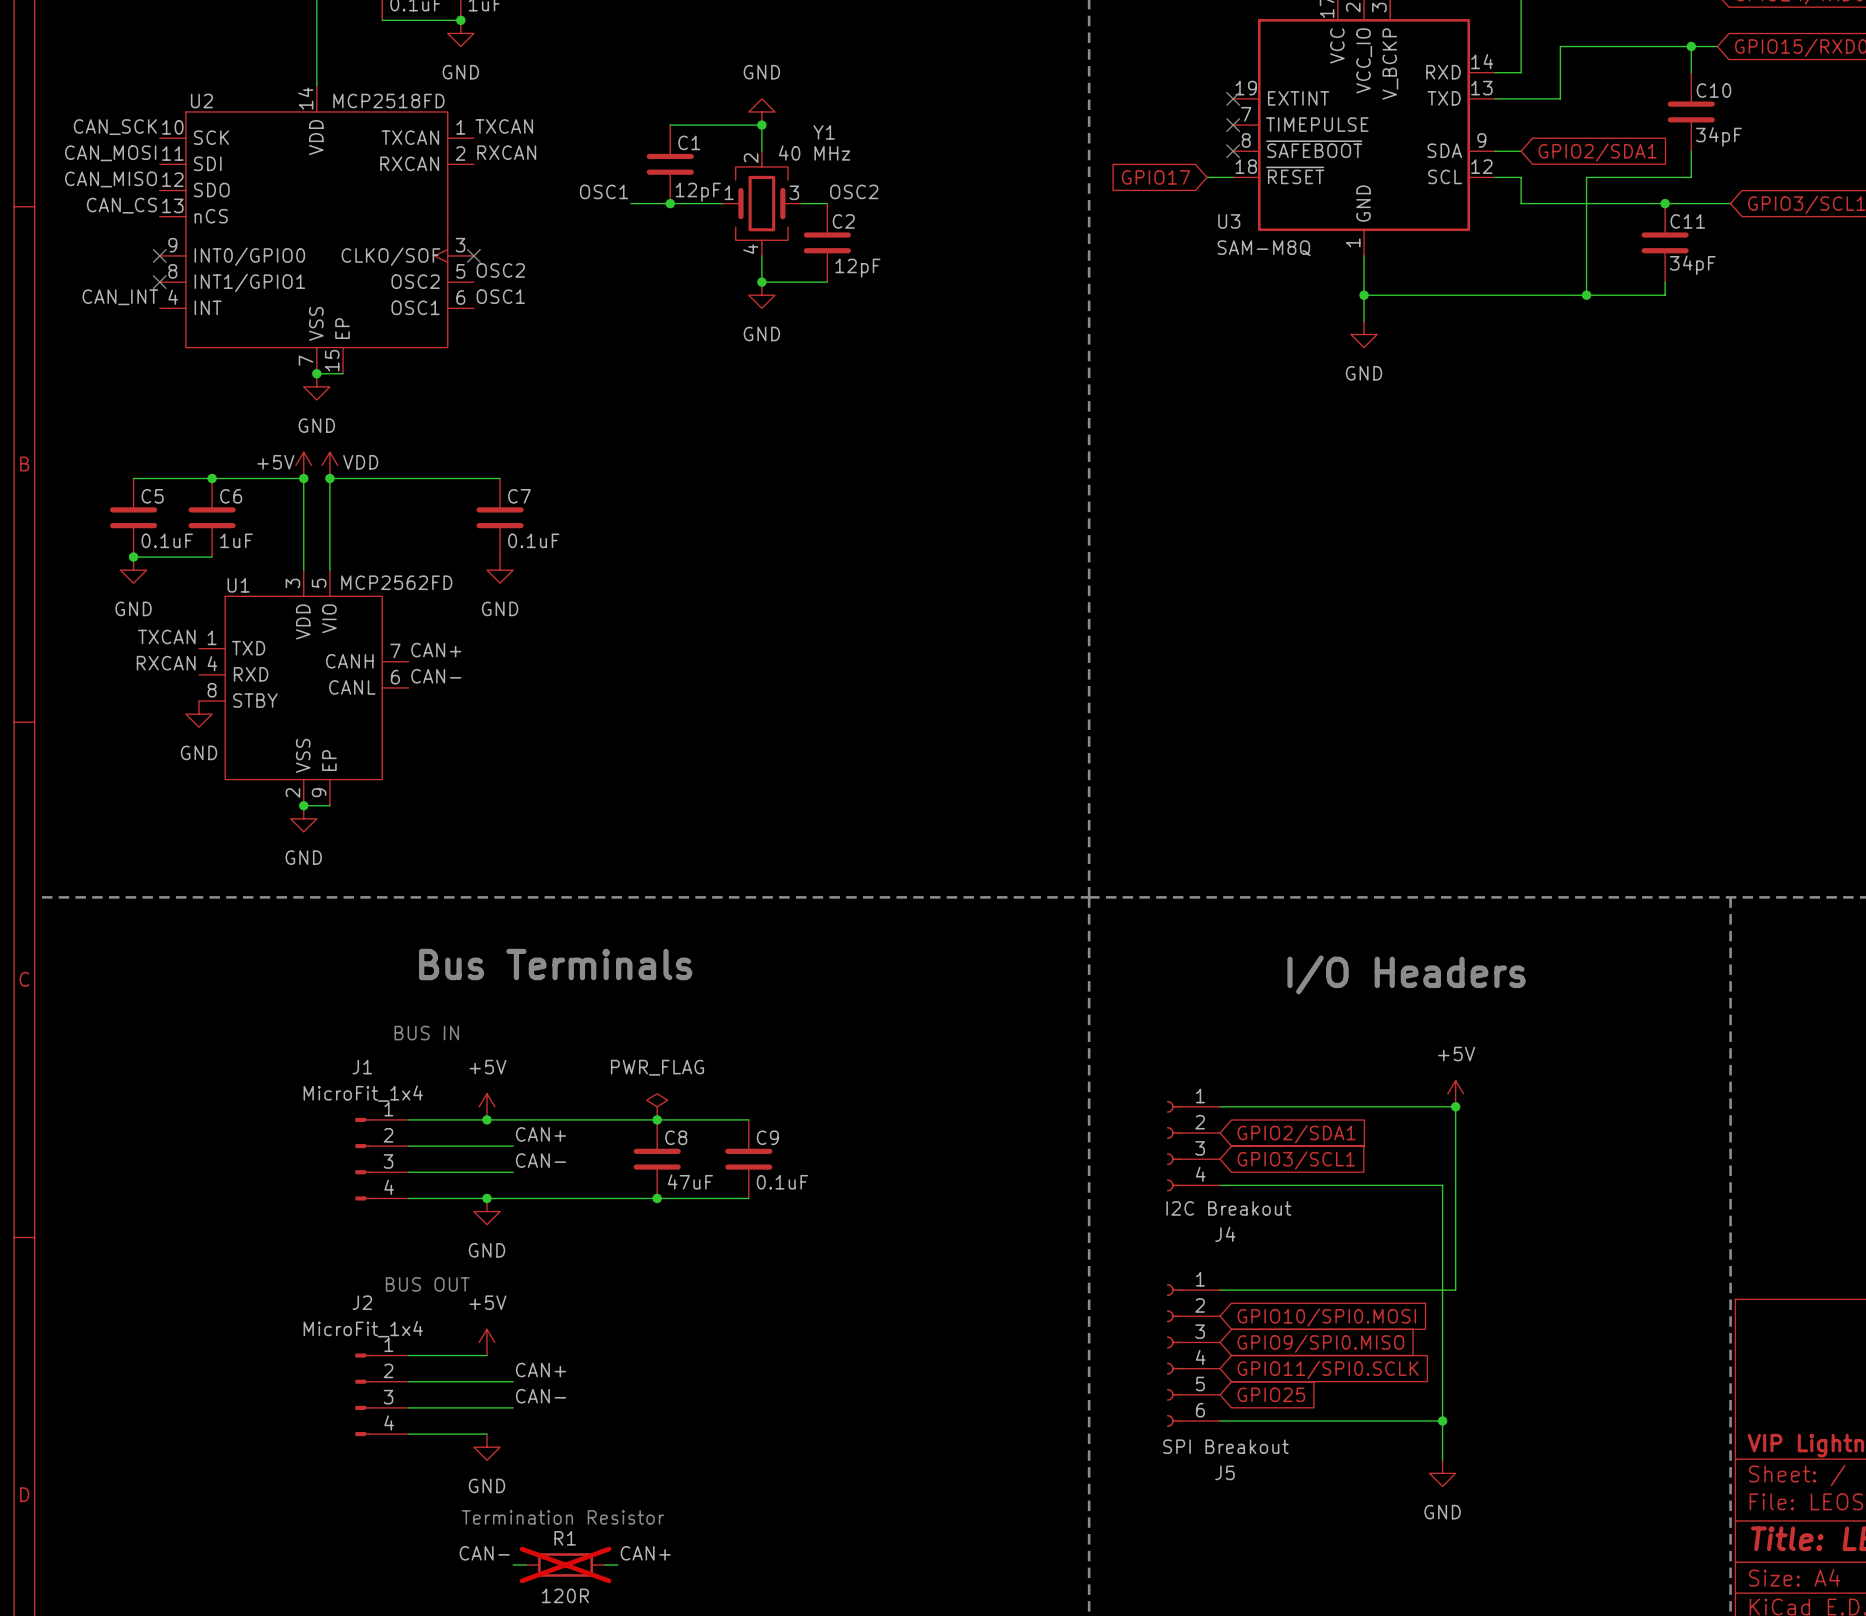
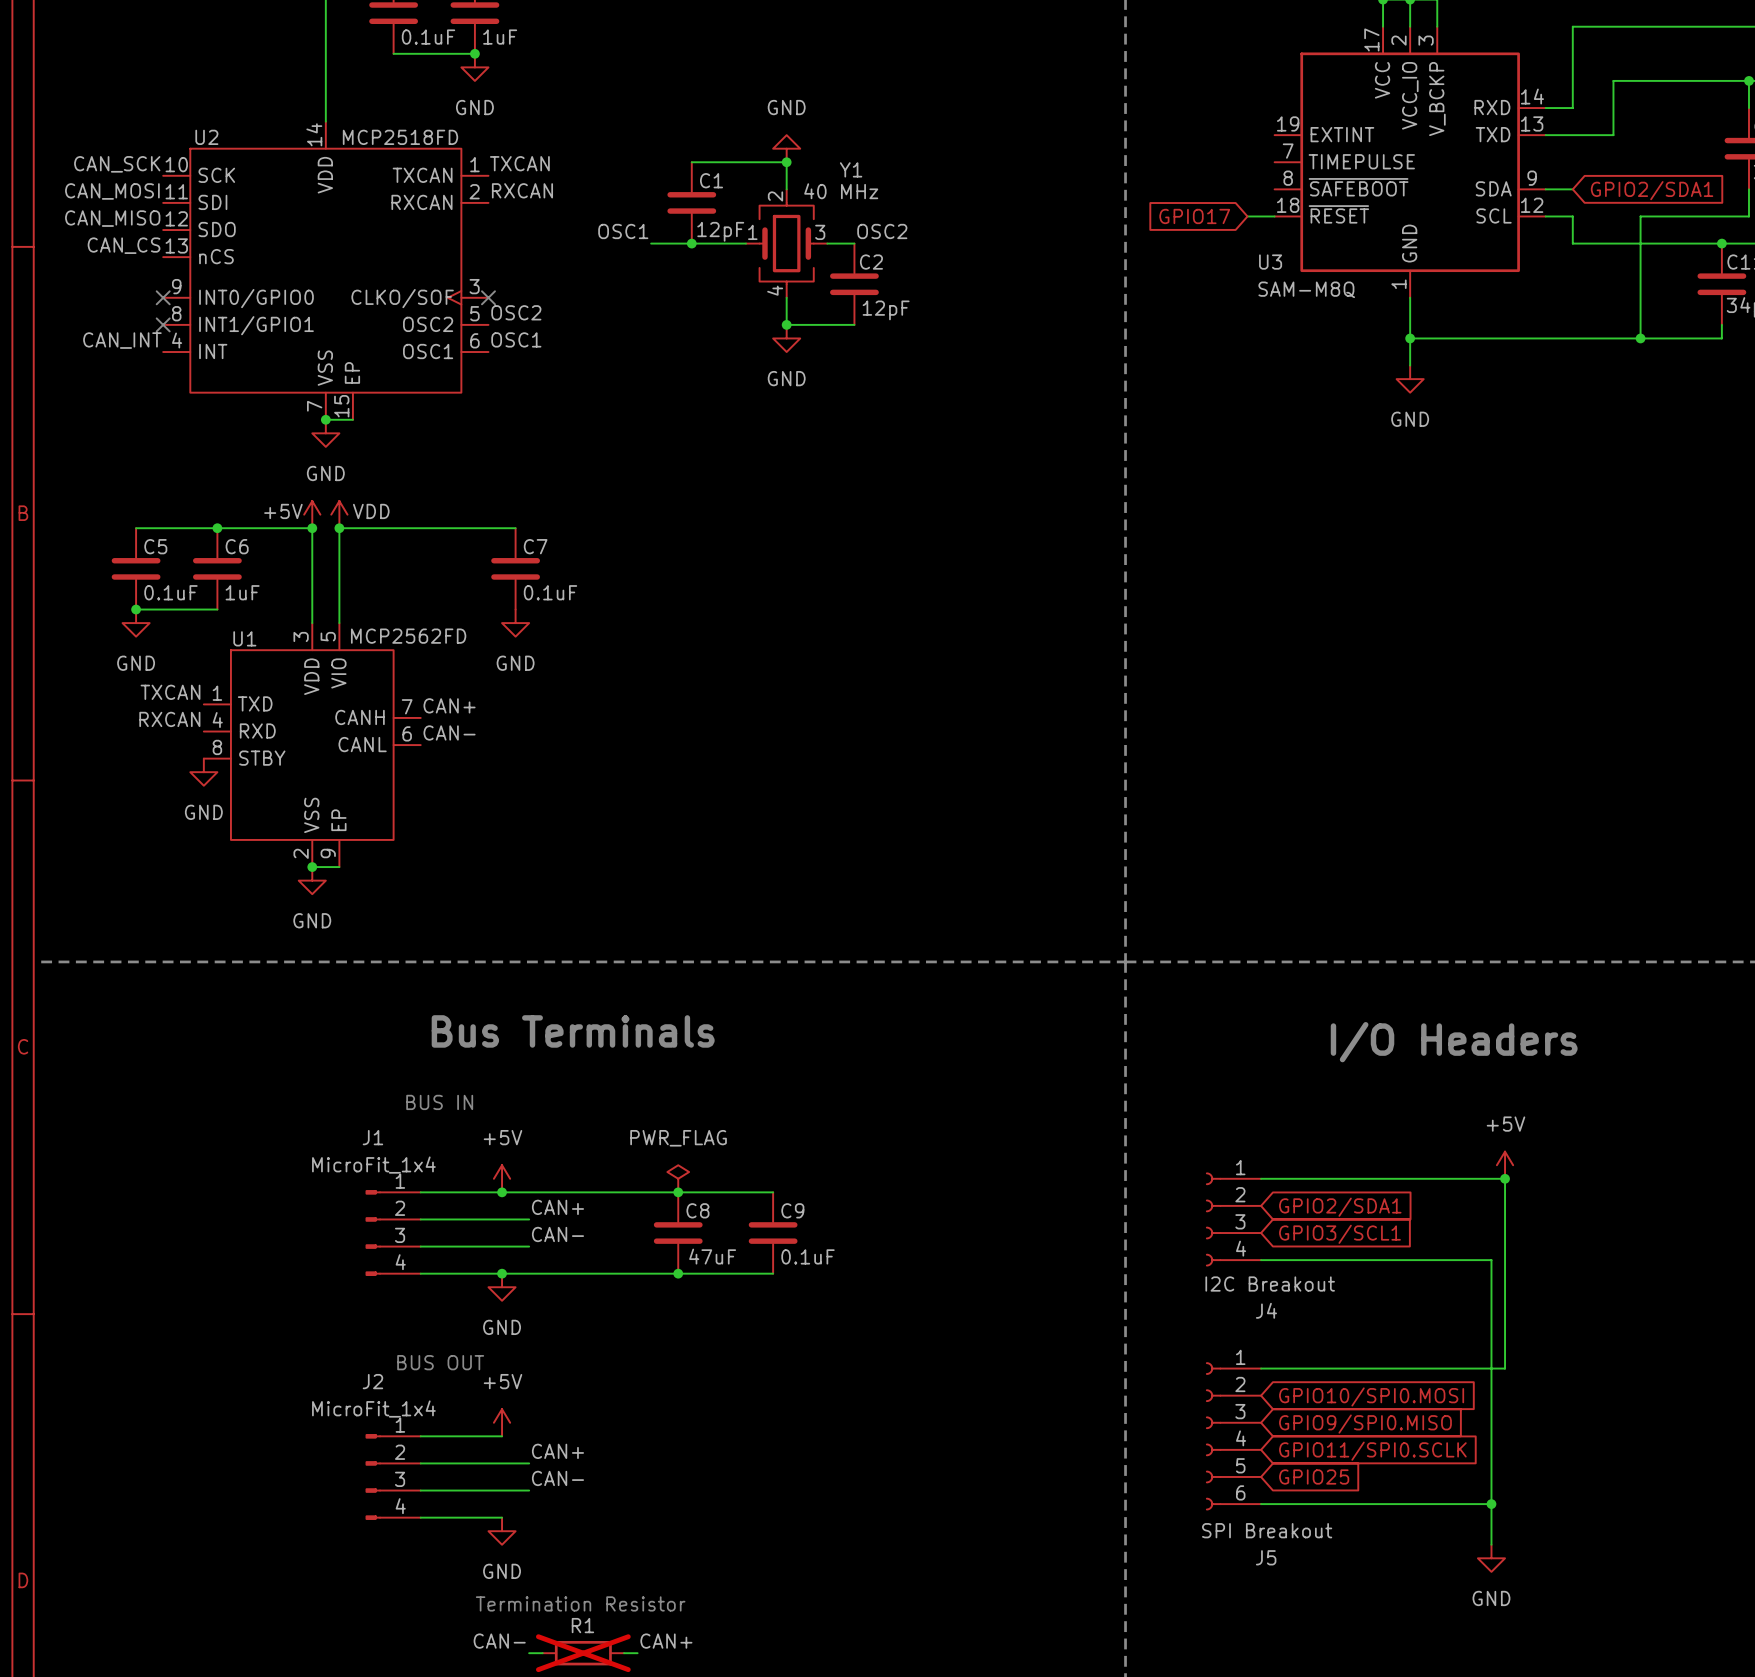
no-connect mark: (1233, 98) -> none
no-connect mark: (1233, 125) -> none
no-connect mark: (1233, 151) -> none

